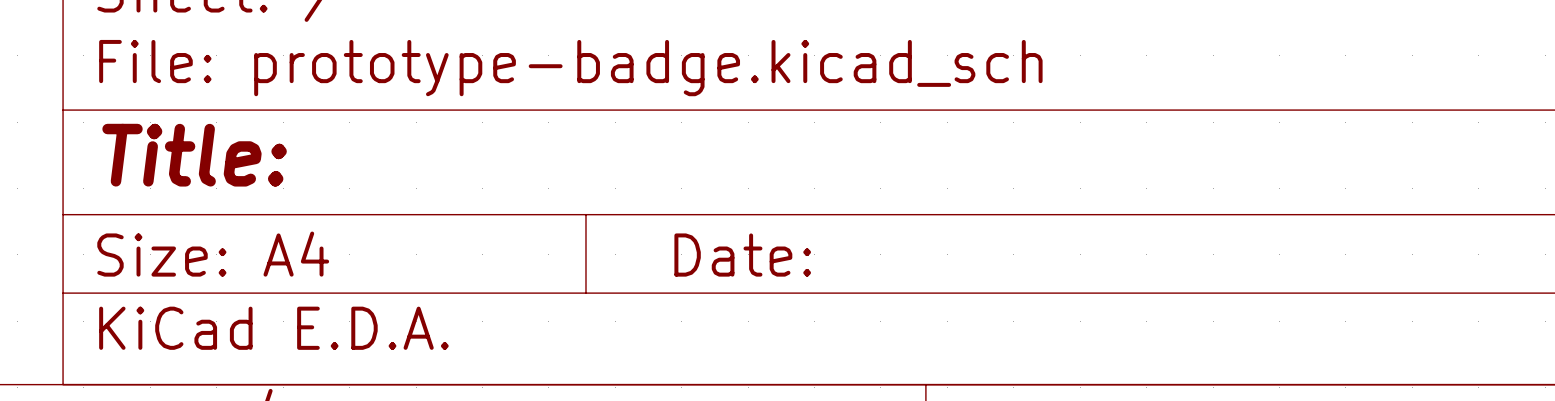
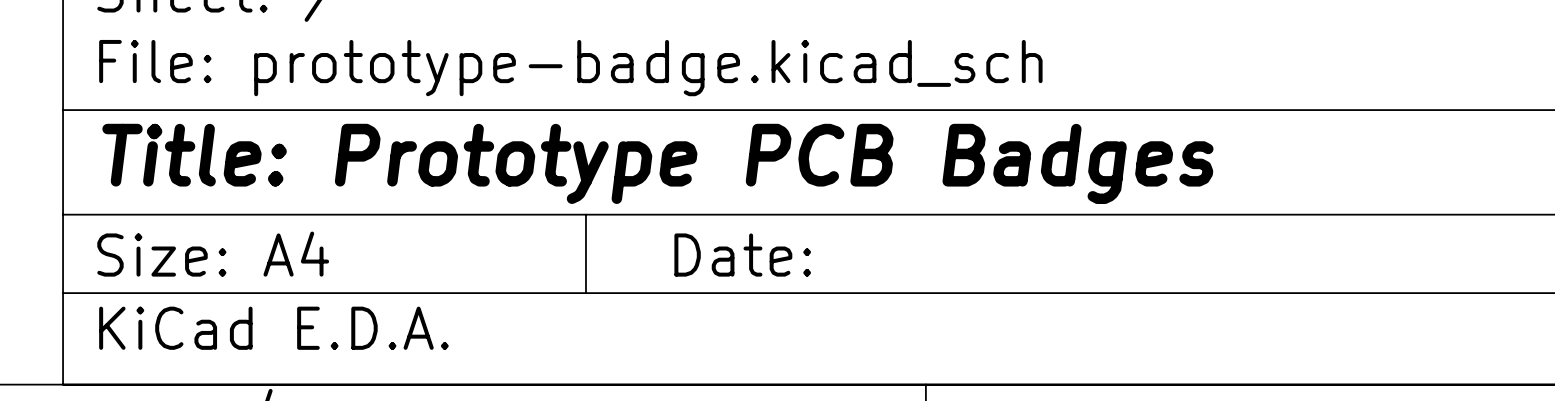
title block: Title: (194, 155) -> Title: Prototype PCB Badges (657, 163)

